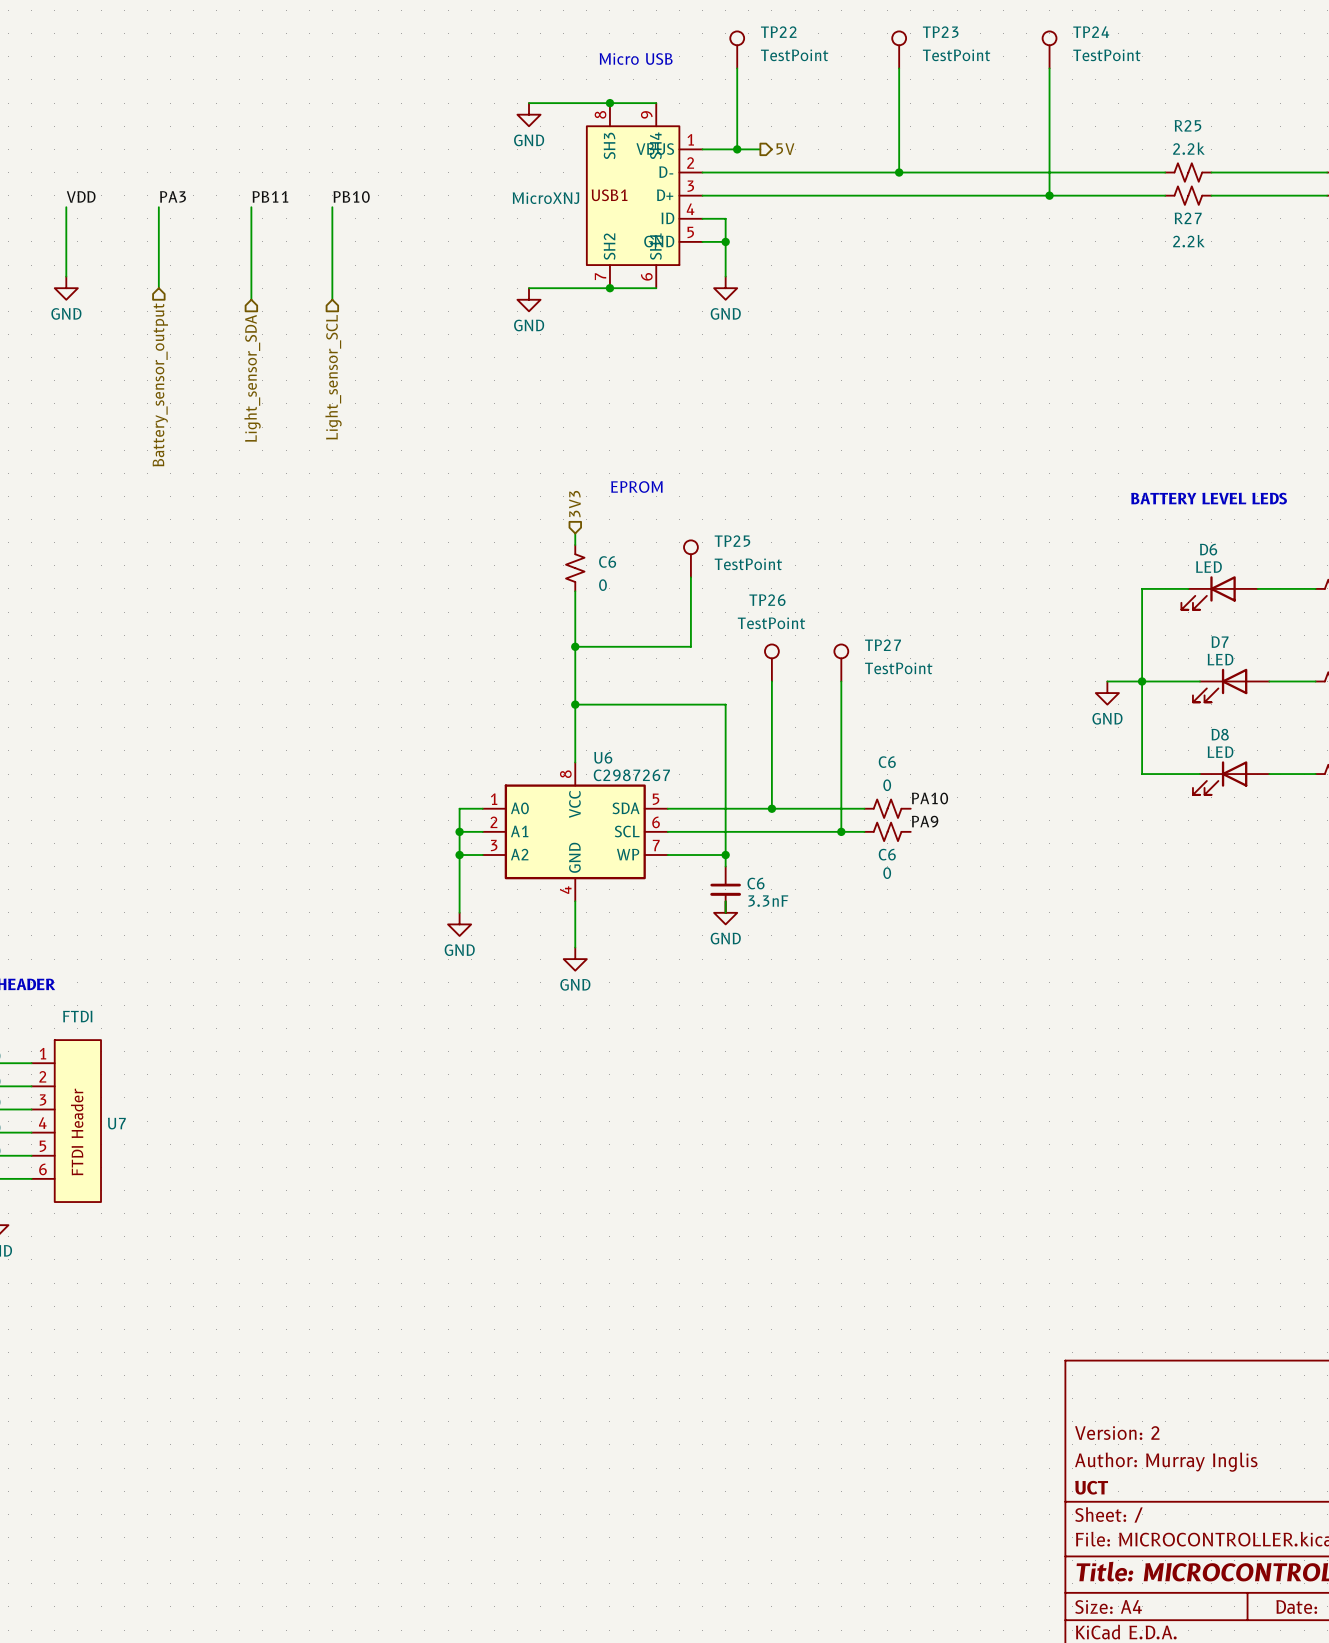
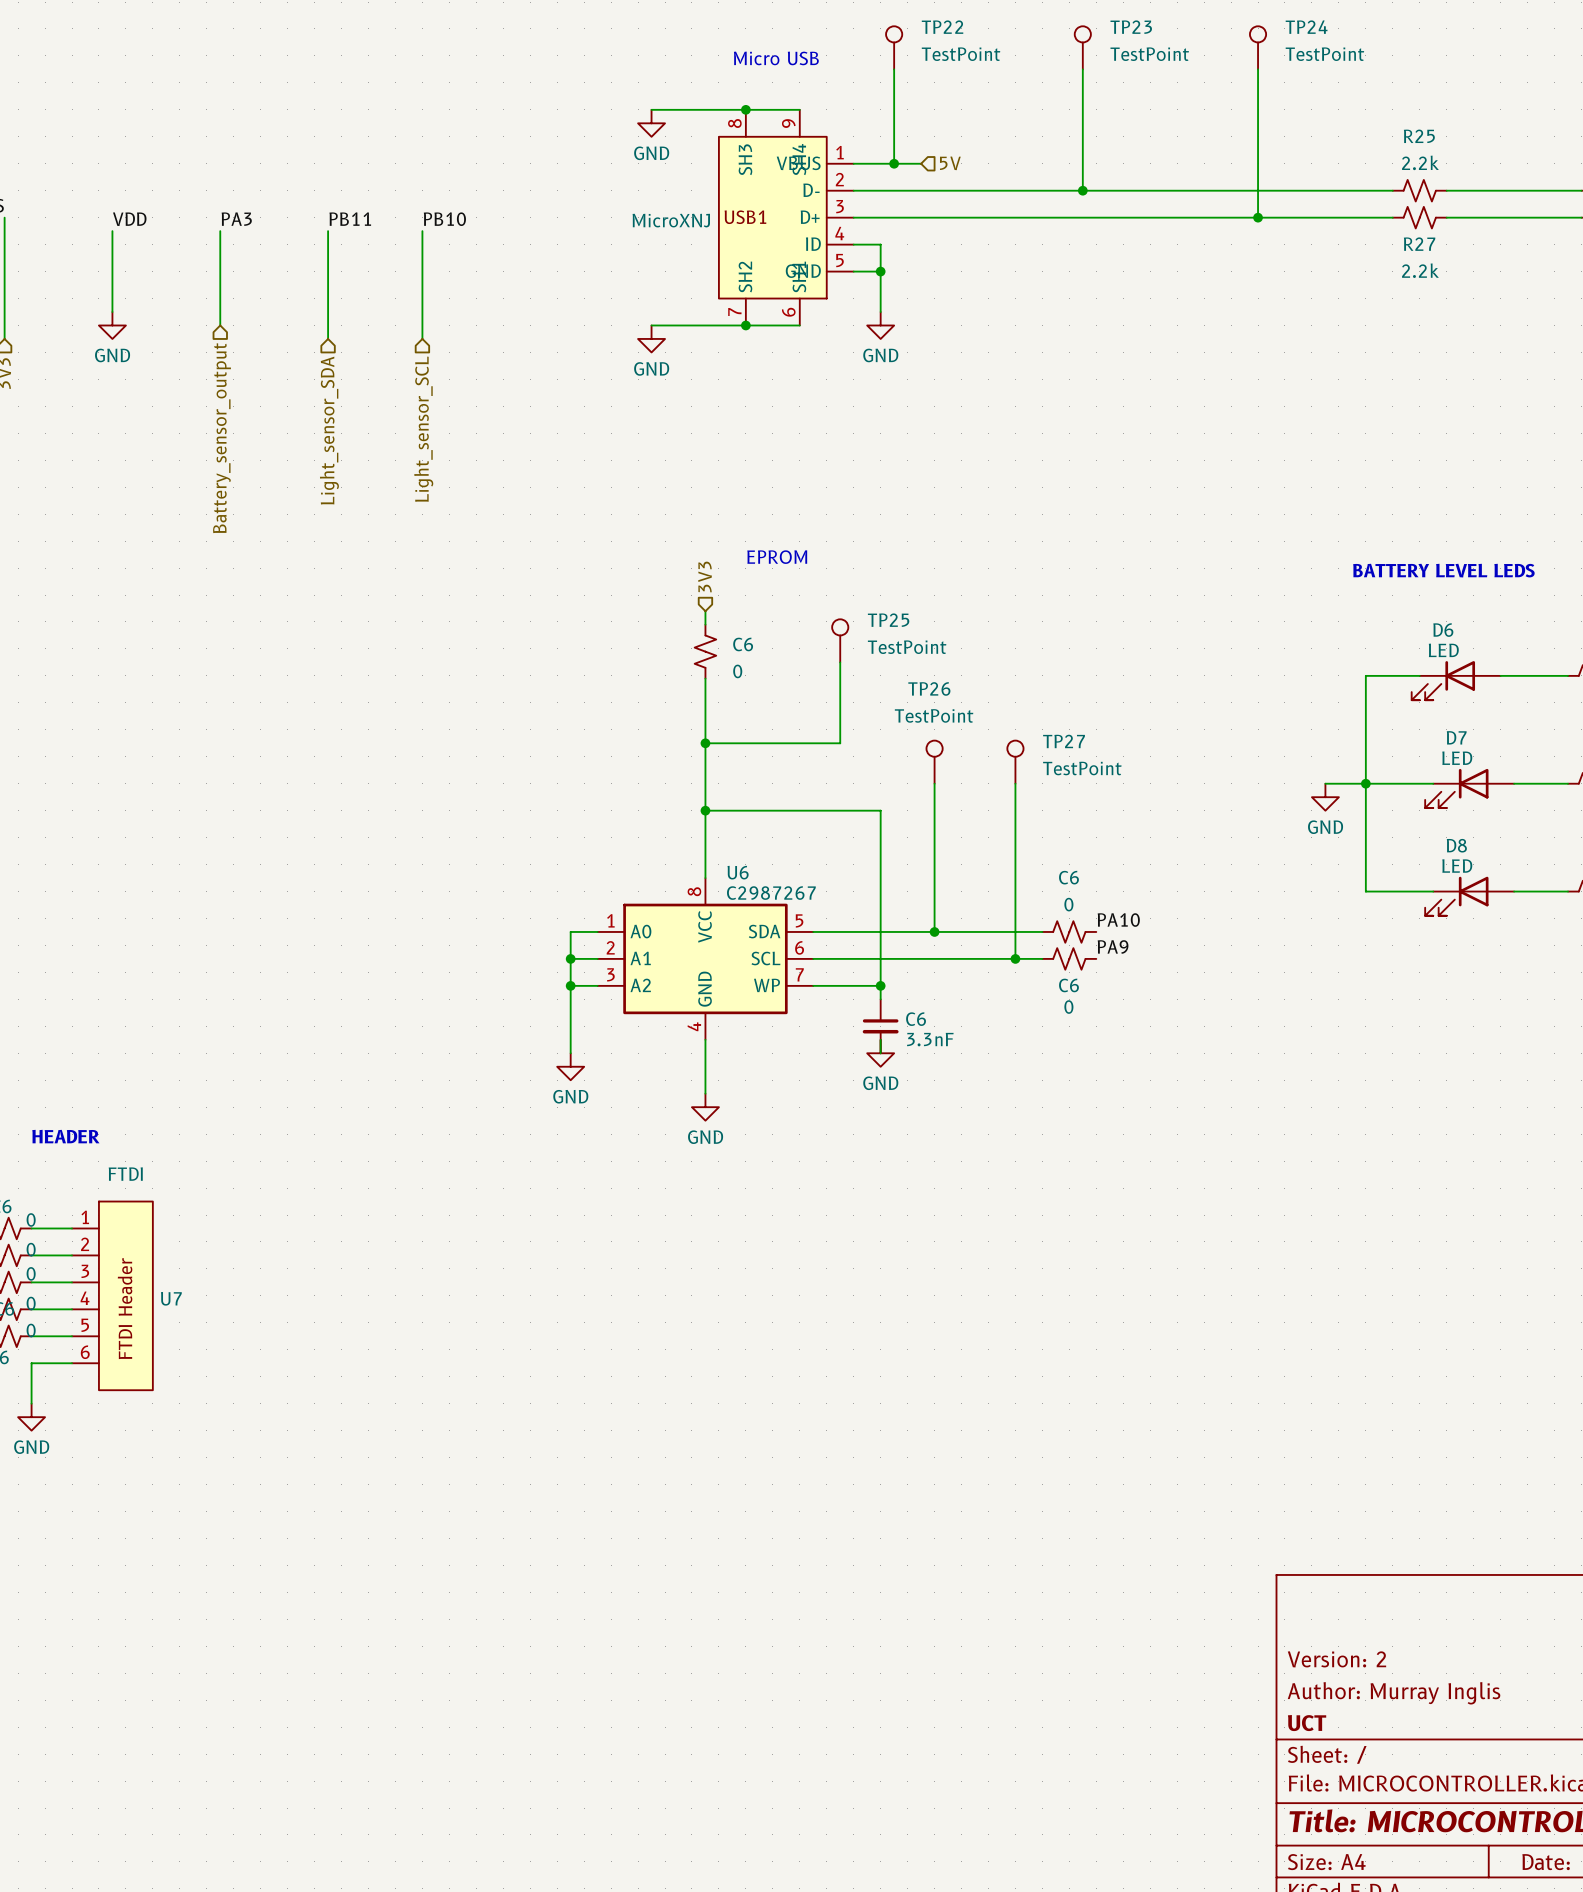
hierarchical label shape: output (785, 149) -> input (950, 163)

